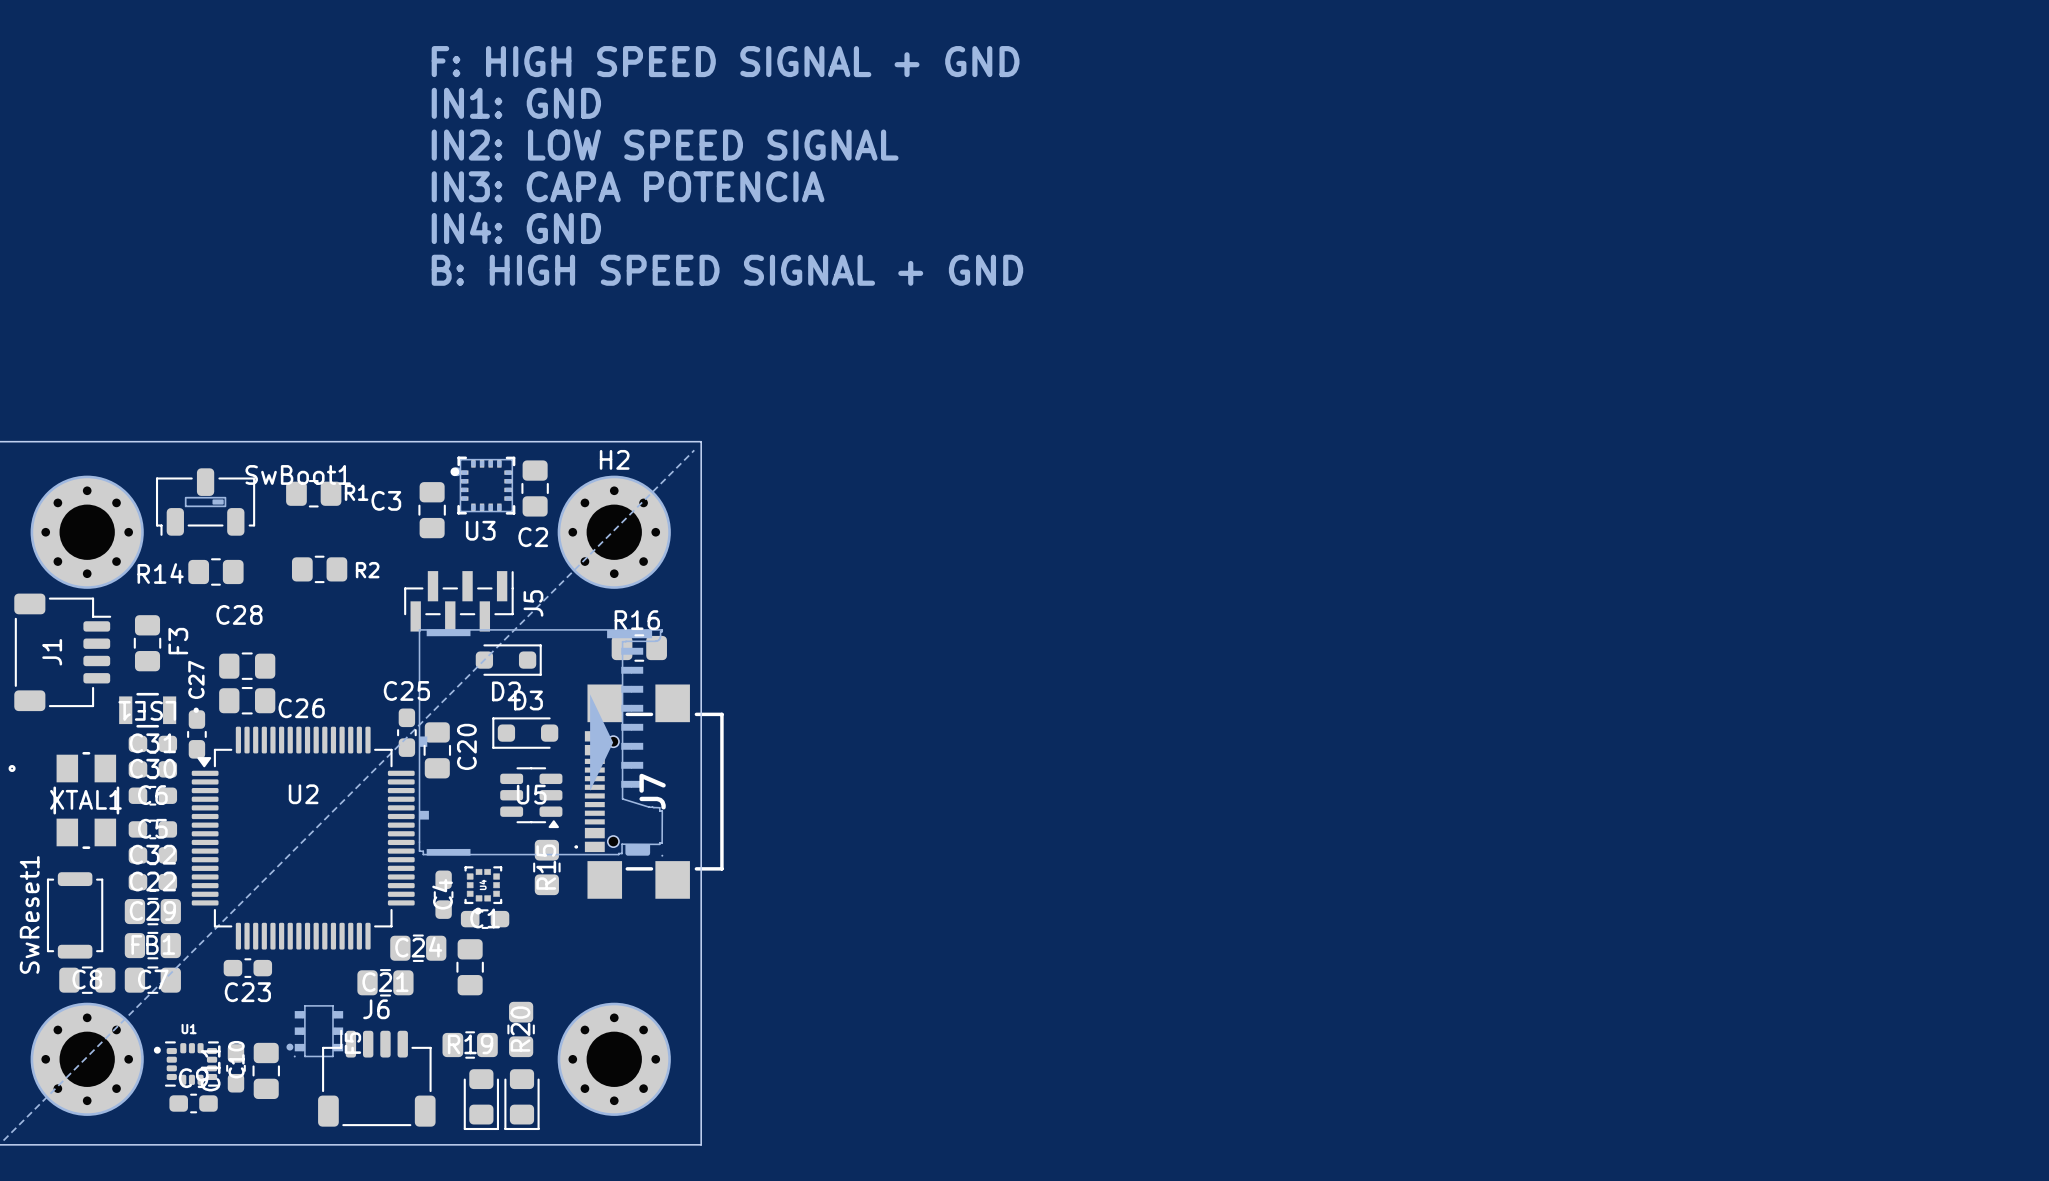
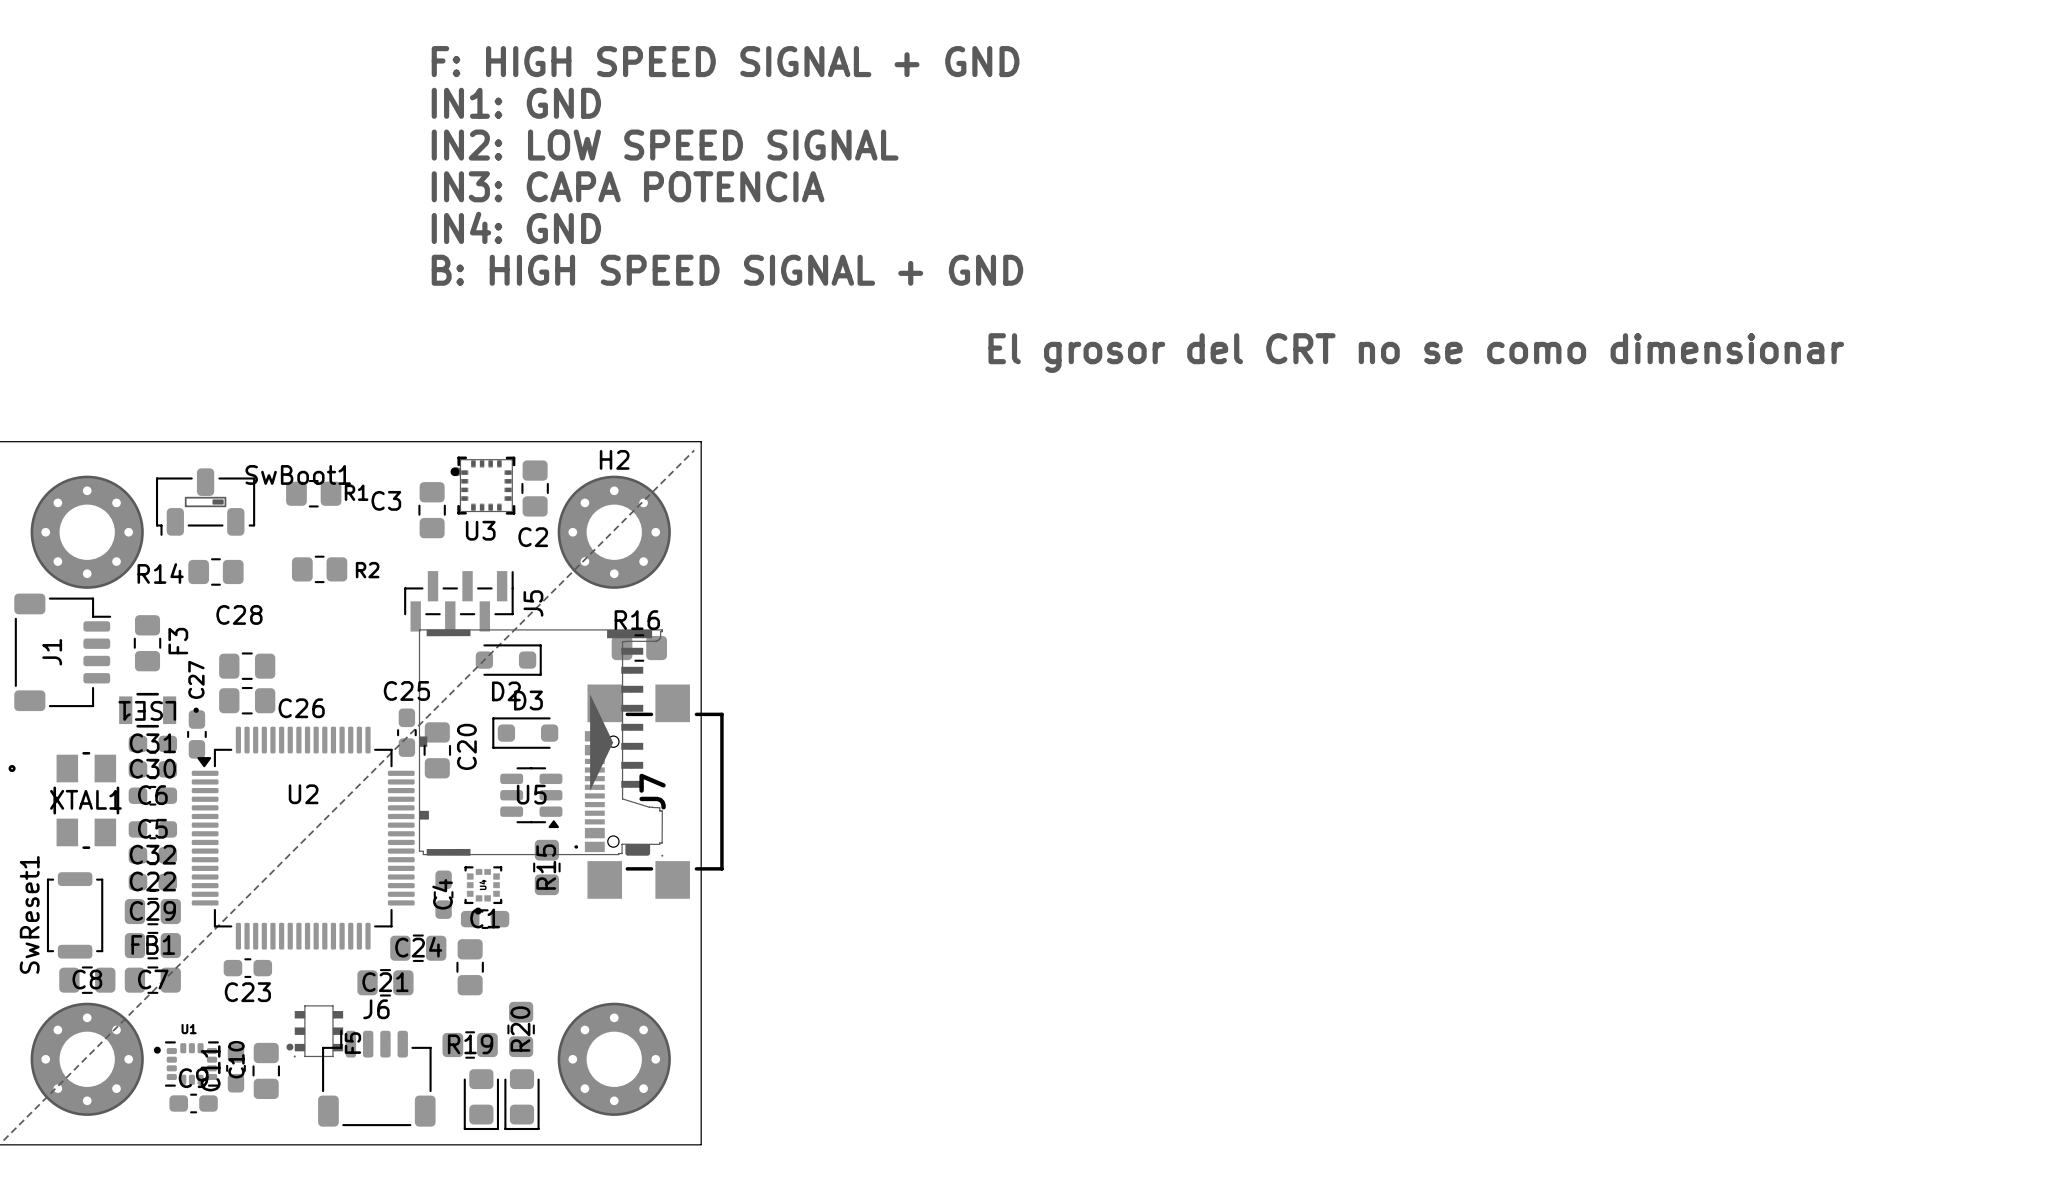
text: none -> El grosor del CRT no se como dimensionar (1416, 353)

